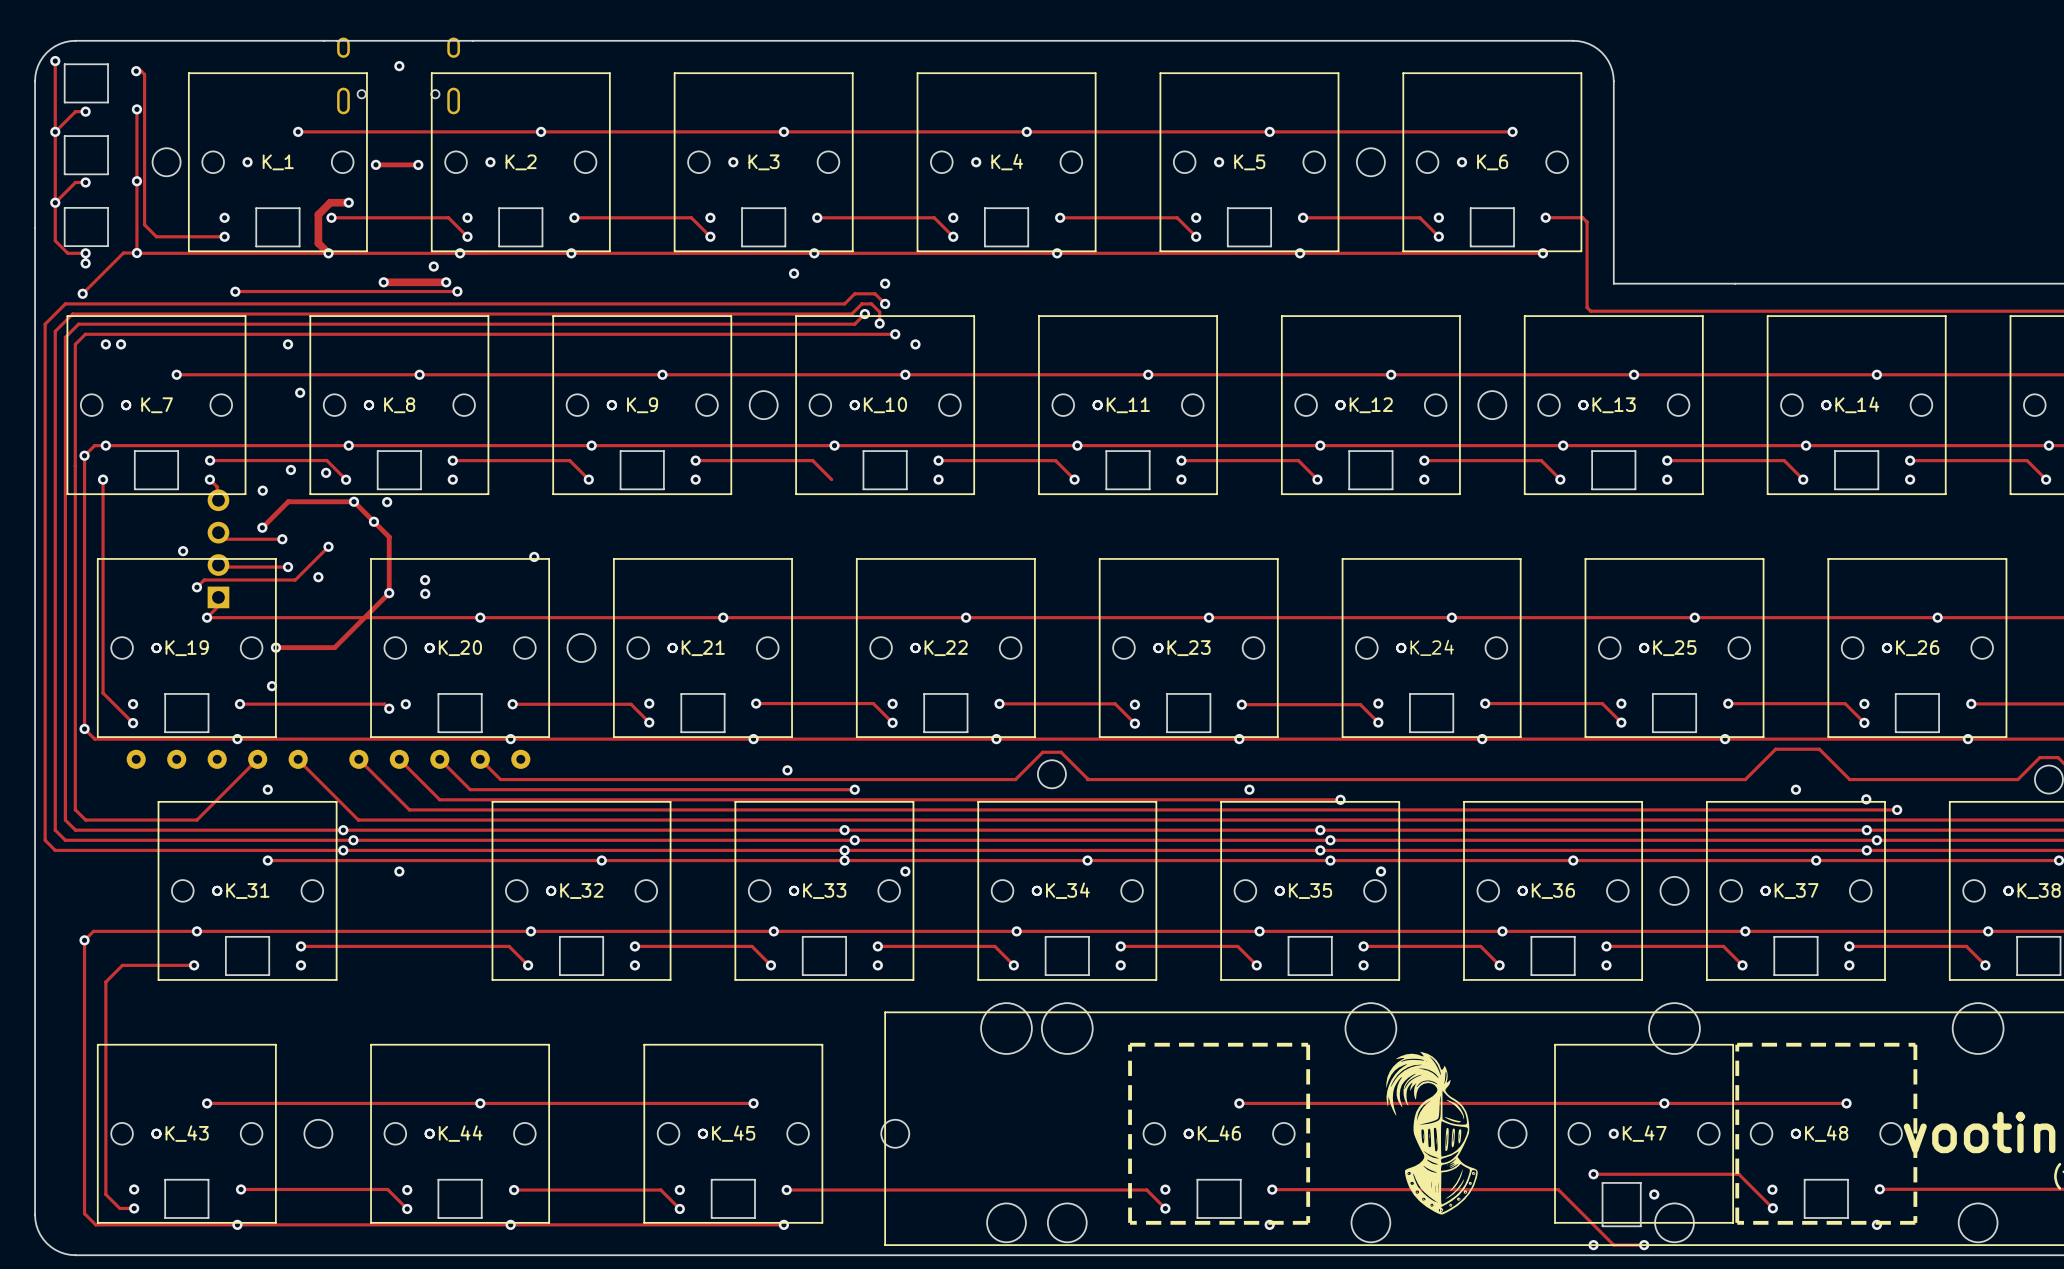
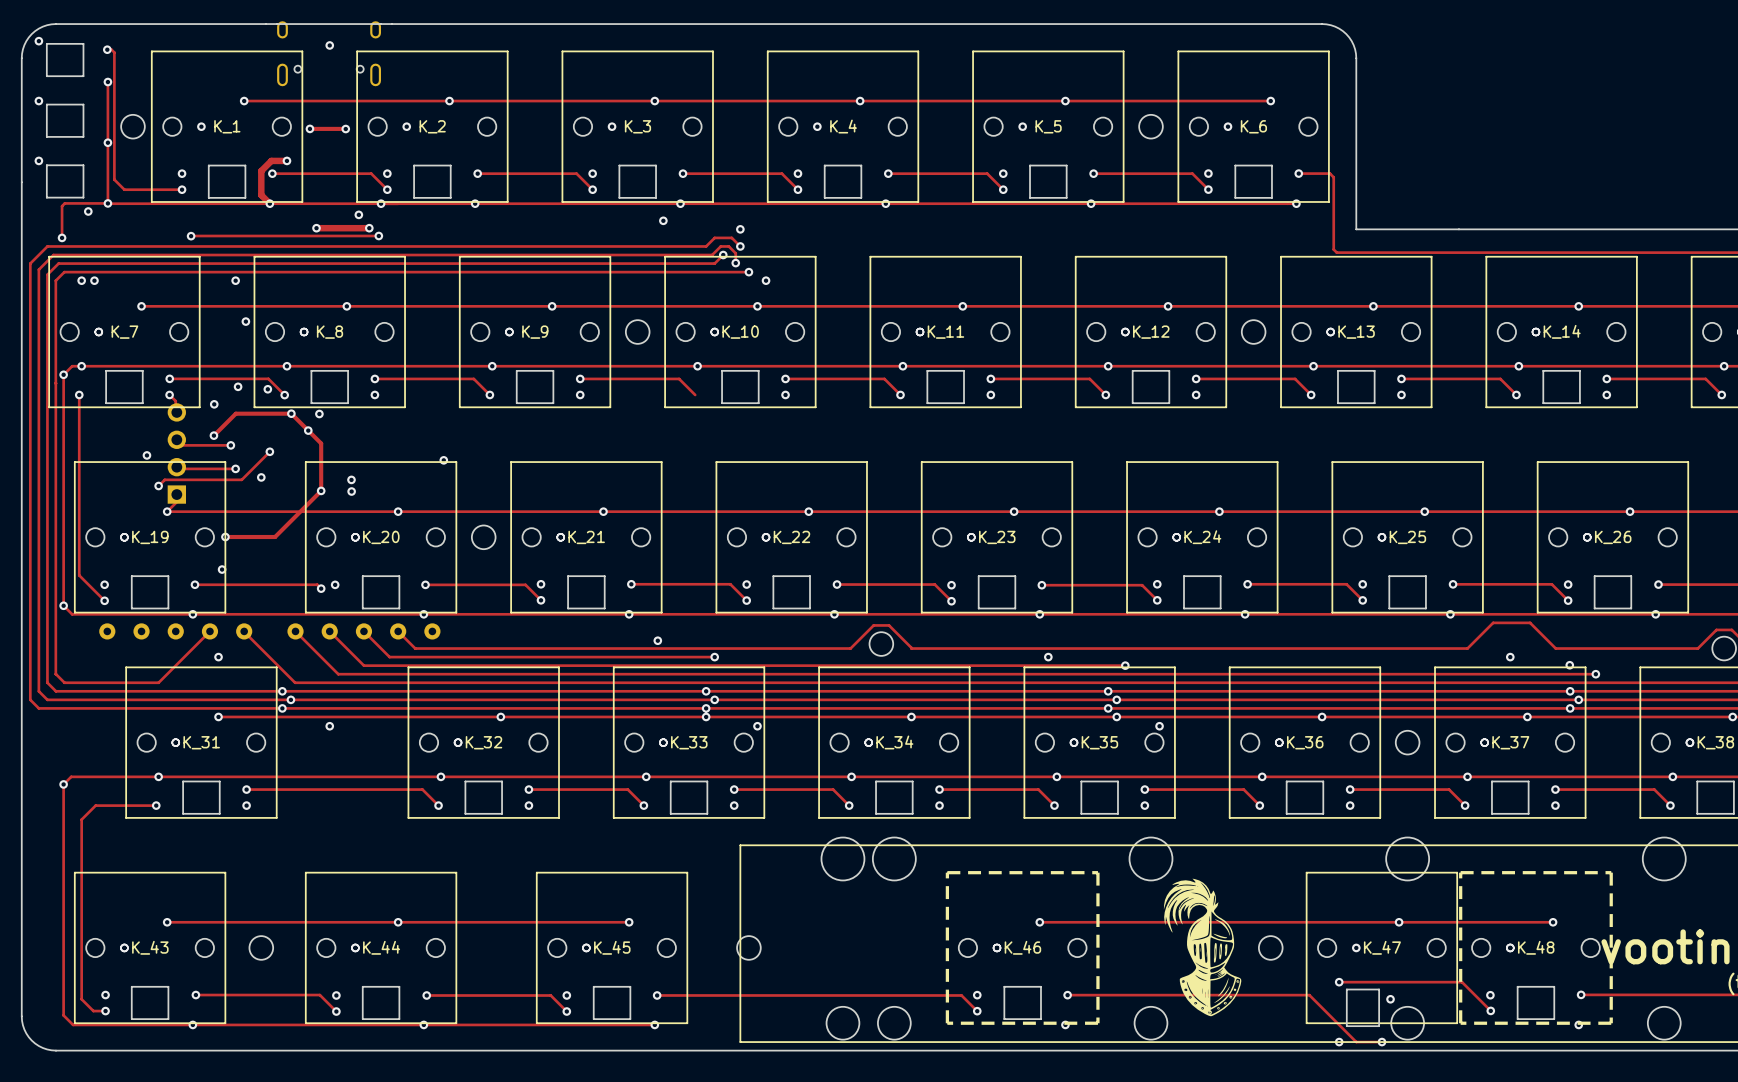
track: (55, 61) (55, 240) (67, 253) (85, 253) (85, 263) -> none
track: (85, 111) (75, 111) (55, 131) -> none
via: (85, 111) -> none
track: (85, 182) (75, 182) (55, 202) -> none
via: (85, 182) -> none
via: (85, 253) -> none
track: (123, 253) (82, 293) -> (96, 203) (64, 203) (62, 206) (62, 237)
via: none -> (88, 211)
via: (85, 263) -> none

